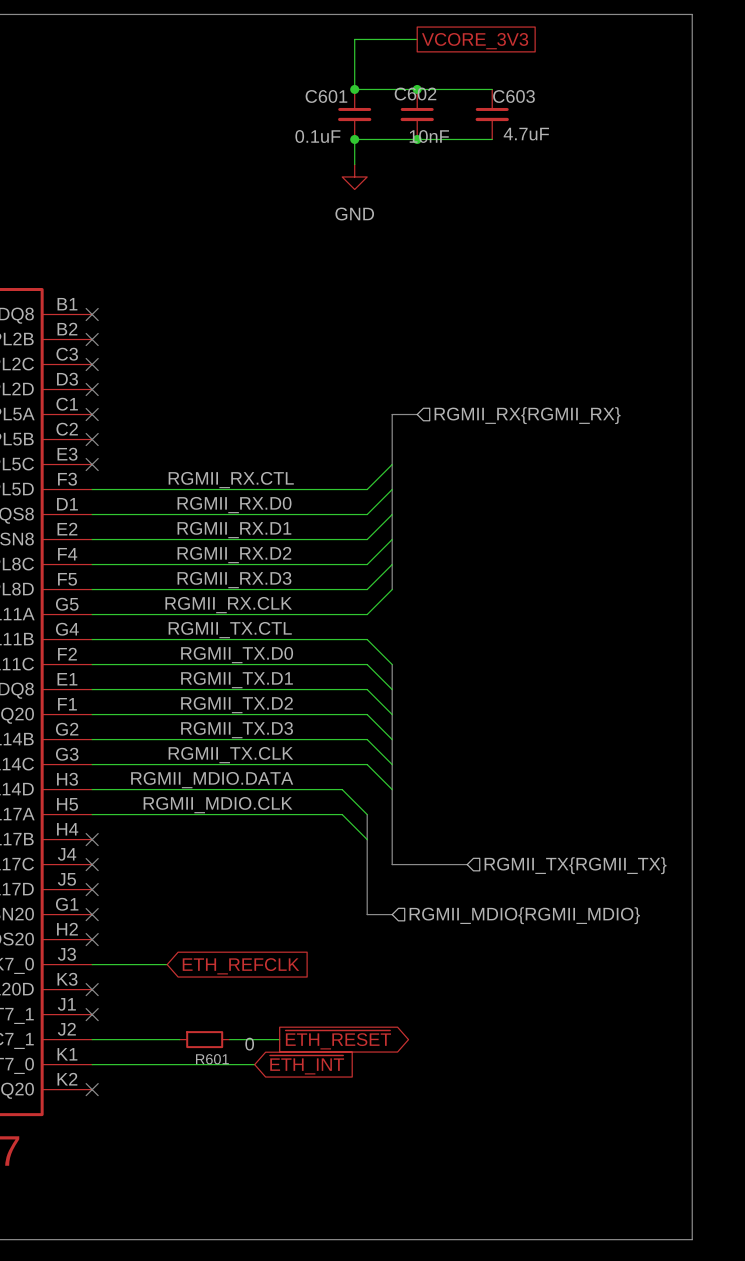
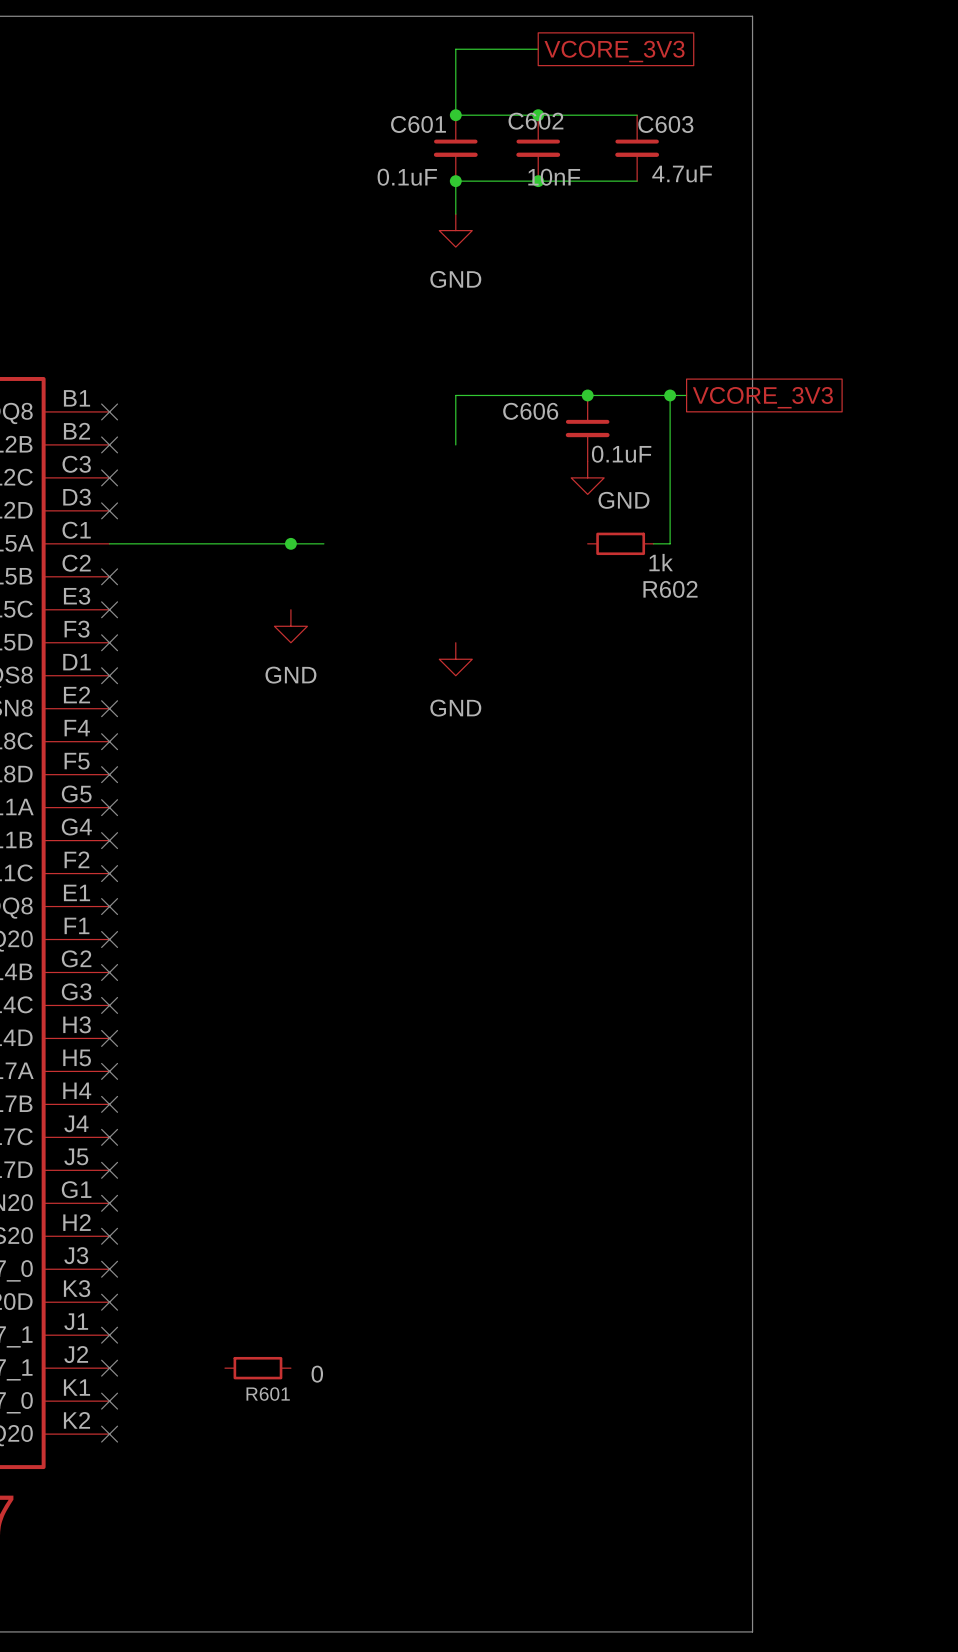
line: (579, 14) (692, 14) (692, 1239) (579, 1239) -> (752, 16) (752, 1631)
junction: none -> (587, 395)
wire: none -> (670, 395) (670, 543) (653, 543)
junction: none -> (670, 395)
wire: none -> (686, 395) (455, 395) (455, 444)
global label: none -> VCORE_3V3 (762, 397)
C606: none -> 0.1uF (587, 428)
power symbol: none -> GND (587, 477)
wire: none -> (109, 543) (323, 543)
no-connect mark: (92, 414) -> none
junction: none -> (290, 543)
bus: (417, 414) (392, 414) (392, 589) -> none
R602: none -> 1k (620, 543)
hierarchical label: RGMII_RX{RGMII_RX} (527, 415) -> none
wire: (392, 464) (367, 489) (92, 489) -> none
power symbol: none -> GND (290, 626)
label: RGMII_RX.CTL (231, 480) -> none
no-connect mark: none -> (109, 642)
wire: (392, 489) (367, 514) (92, 514) -> none
power symbol: none -> GND (455, 659)
label: RGMII_RX.D0 (234, 505) -> none
no-connect mark: none -> (109, 675)
wire: (392, 514) (367, 539) (92, 539) -> none
label: RGMII_RX.D1 (234, 530) -> none
no-connect mark: none -> (109, 708)
wire: (392, 539) (367, 564) (92, 564) -> none
label: RGMII_RX.D2 (234, 555) -> none
no-connect mark: none -> (109, 741)
wire: (392, 564) (367, 589) (92, 589) -> none
label: RGMII_RX.D3 (234, 580) -> none
no-connect mark: none -> (109, 774)
wire: (392, 589) (367, 614) (92, 614) -> none
label: RGMII_RX.CLK (228, 605) -> none
no-connect mark: none -> (109, 807)
label: RGMII_TX.CTL (230, 630) -> none
wire: (92, 639) (367, 639) (392, 664) -> none
no-connect mark: none -> (109, 840)
label: RGMII_TX.D0 (237, 655) -> none
wire: (92, 664) (367, 664) (392, 689) -> none
no-connect mark: none -> (109, 873)
bus: (392, 664) (392, 864) (467, 864) -> none
label: RGMII_TX.D1 (237, 680) -> none
wire: (92, 689) (367, 689) (392, 714) -> none
no-connect mark: none -> (109, 906)
label: RGMII_TX.D2 (237, 705) -> none
wire: (92, 714) (367, 714) (392, 739) -> none
no-connect mark: none -> (109, 939)
label: RGMII_TX.D3 (237, 730) -> none
wire: (92, 739) (367, 739) (392, 764) -> none
no-connect mark: none -> (109, 972)
label: RGMII_TX.CLK (230, 755) -> none
wire: (92, 764) (367, 764) (392, 789) -> none
no-connect mark: none -> (109, 1005)
label: RGMII_MDIO.DATA (212, 780) -> none
wire: (92, 789) (342, 789) (367, 814) -> none
no-connect mark: none -> (109, 1038)
label: RGMII_MDIO.CLK (218, 805) -> none
wire: (92, 814) (342, 814) (367, 839) -> none
no-connect mark: none -> (109, 1071)
bus: (367, 814) (367, 914) (392, 914) -> none
hierarchical label: RGMII_TX{RGMII_TX} (575, 865) -> none
hierarchical label: RGMII_MDIO{RGMII_MDIO} (524, 915) -> none
wire: (92, 964) (167, 964) -> none
no-connect mark: none -> (109, 1269)
global label: ETH_REFCLK (240, 966) -> none
wire: (92, 1039) (179, 1039) -> none
no-connect mark: none -> (109, 1368)
wire: (229, 1039) (279, 1039) -> none
global label: ~{ETH_RESET} (338, 1039) -> none
wire: (92, 1064) (254, 1064) -> none
no-connect mark: none -> (109, 1401)
global label: ~{ETH_INT} (307, 1064) -> none

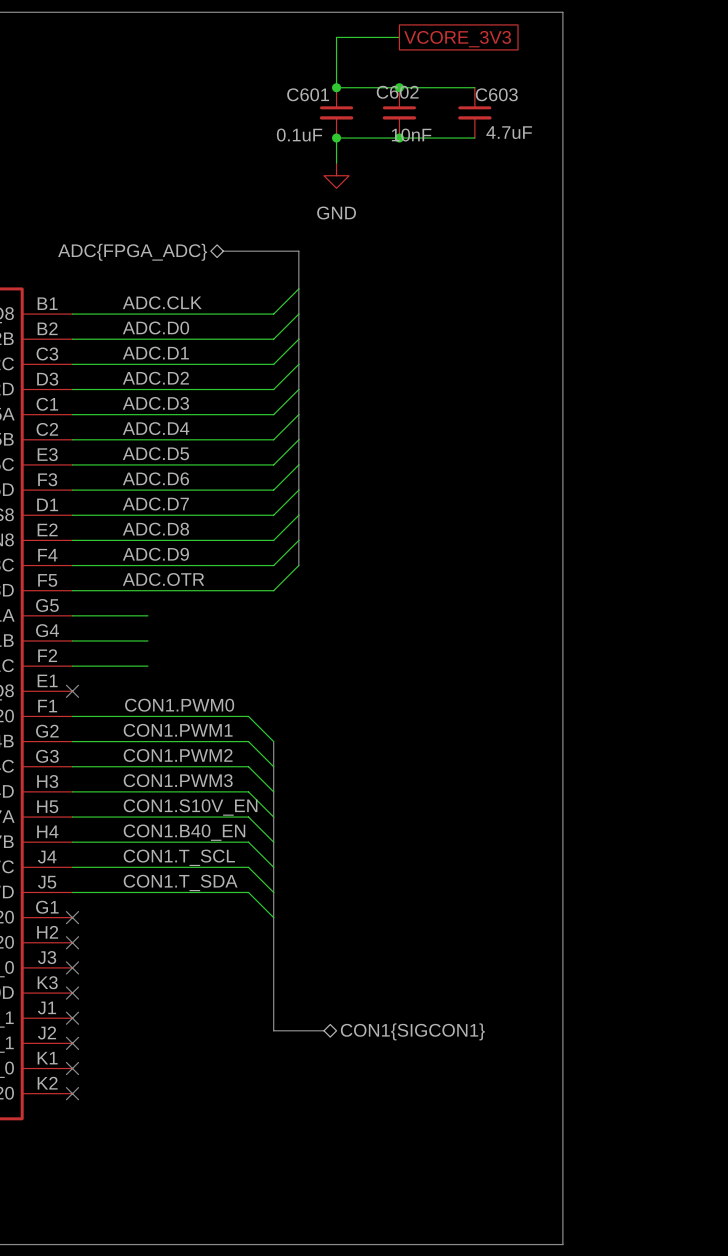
bus: none -> (223, 251) (298, 251) (298, 565)
hierarchical label: none -> ADC{FPGA_ADC} (132, 252)
wire: none -> (298, 288) (273, 314) (72, 314)
junction: (587, 395) -> none
wire: (670, 395) (670, 543) (653, 543) -> none
junction: (670, 395) -> none
wire: (686, 395) (455, 395) (455, 444) -> none
label: none -> ADC.CLK (162, 302)
global label: VCORE_3V3 (762, 397) -> none
no-connect mark: (109, 411) -> none
wire: none -> (298, 314) (273, 339) (72, 339)
C606: 0.1uF (587, 428) -> none
label: none -> ADC.D0 (155, 327)
no-connect mark: (109, 444) -> none
wire: none -> (298, 339) (273, 364) (72, 364)
label: none -> ADC.D1 (155, 353)
no-connect mark: (109, 477) -> none
wire: none -> (298, 364) (273, 389) (72, 389)
power symbol: GND (587, 477) -> none
label: none -> ADC.D2 (155, 378)
no-connect mark: (109, 510) -> none
wire: none -> (298, 389) (273, 414) (235, 414)
label: none -> ADC.D3 (155, 403)
junction: (290, 543) -> none
wire: none -> (298, 414) (273, 439) (72, 439)
R602: 1k (620, 543) -> none
label: none -> ADC.D4 (156, 428)
no-connect mark: (109, 576) -> none
wire: none -> (298, 439) (273, 464) (72, 464)
label: none -> ADC.D5 (155, 453)
no-connect mark: (109, 609) -> none
wire: none -> (298, 464) (273, 490) (72, 490)
power symbol: GND (290, 626) -> none
label: none -> ADC.D6 (155, 478)
no-connect mark: (109, 642) -> none
wire: none -> (298, 490) (273, 515) (72, 515)
power symbol: GND (455, 659) -> none
label: none -> ADC.D7 (155, 504)
no-connect mark: (109, 675) -> none
wire: none -> (298, 515) (273, 540) (72, 540)
label: none -> ADC.D8 (155, 529)
no-connect mark: (109, 708) -> none
wire: none -> (298, 540) (273, 565) (72, 565)
label: none -> ADC.D9 (155, 554)
no-connect mark: (109, 741) -> none
wire: none -> (298, 565) (273, 590) (72, 590)
label: none -> ADC.OTR (163, 579)
no-connect mark: (109, 774) -> none
wire: none -> (72, 615) (147, 615)
no-connect mark: (109, 807) -> none
wire: none -> (72, 640) (147, 640)
no-connect mark: (109, 840) -> none
wire: none -> (72, 666) (147, 666)
no-connect mark: (109, 873) -> none
label: none -> CON1.PWM0 (179, 705)
wire: none -> (72, 716) (248, 716) (273, 741)
no-connect mark: (109, 939) -> none
label: none -> CON1.PWM1 (178, 730)
wire: none -> (72, 741) (248, 741) (273, 766)
no-connect mark: (109, 972) -> none
bus: none -> (273, 741) (273, 1030) (323, 1030)
label: none -> CON1.PWM2 (178, 755)
wire: none -> (72, 766) (248, 766) (273, 791)
no-connect mark: (109, 1005) -> none
label: none -> CON1.PWM3 (178, 780)
wire: none -> (72, 791) (248, 791) (273, 817)
no-connect mark: (109, 1038) -> none
label: none -> CON1.S10V_EN (190, 807)
wire: none -> (72, 817) (248, 817) (273, 842)
no-connect mark: (109, 1071) -> none
label: none -> CON1.B40_EN (184, 832)
wire: none -> (72, 842) (248, 842) (273, 867)
no-connect mark: (109, 1104) -> none
label: none -> CON1.T_SCL (179, 857)
wire: none -> (72, 867) (248, 867) (273, 892)
no-connect mark: (109, 1137) -> none
label: none -> CON1.T_SDA (180, 882)
wire: none -> (72, 892) (248, 892) (273, 917)
no-connect mark: (109, 1170) -> none
hierarchical label: none -> CON1{SIGCON1} (412, 1031)
R601: 0 (257, 1368) -> none

